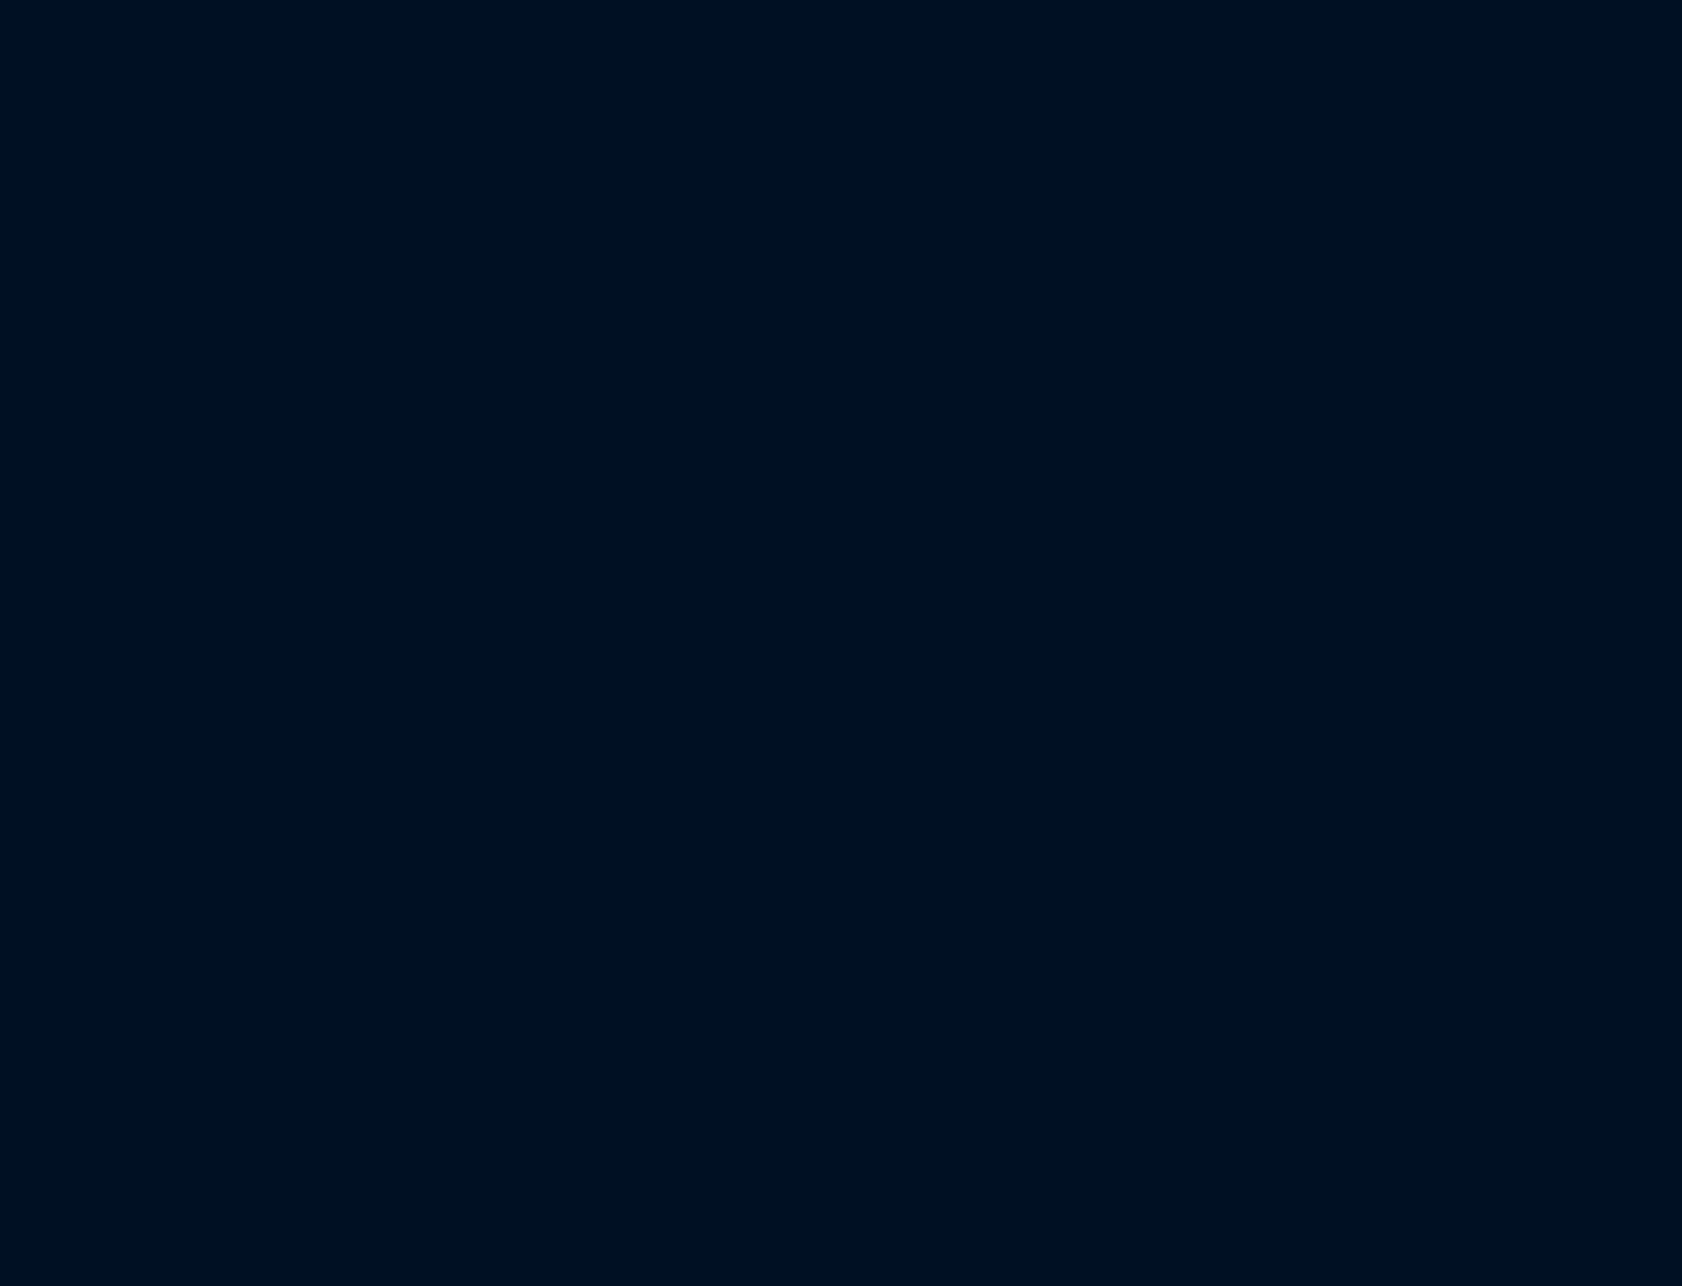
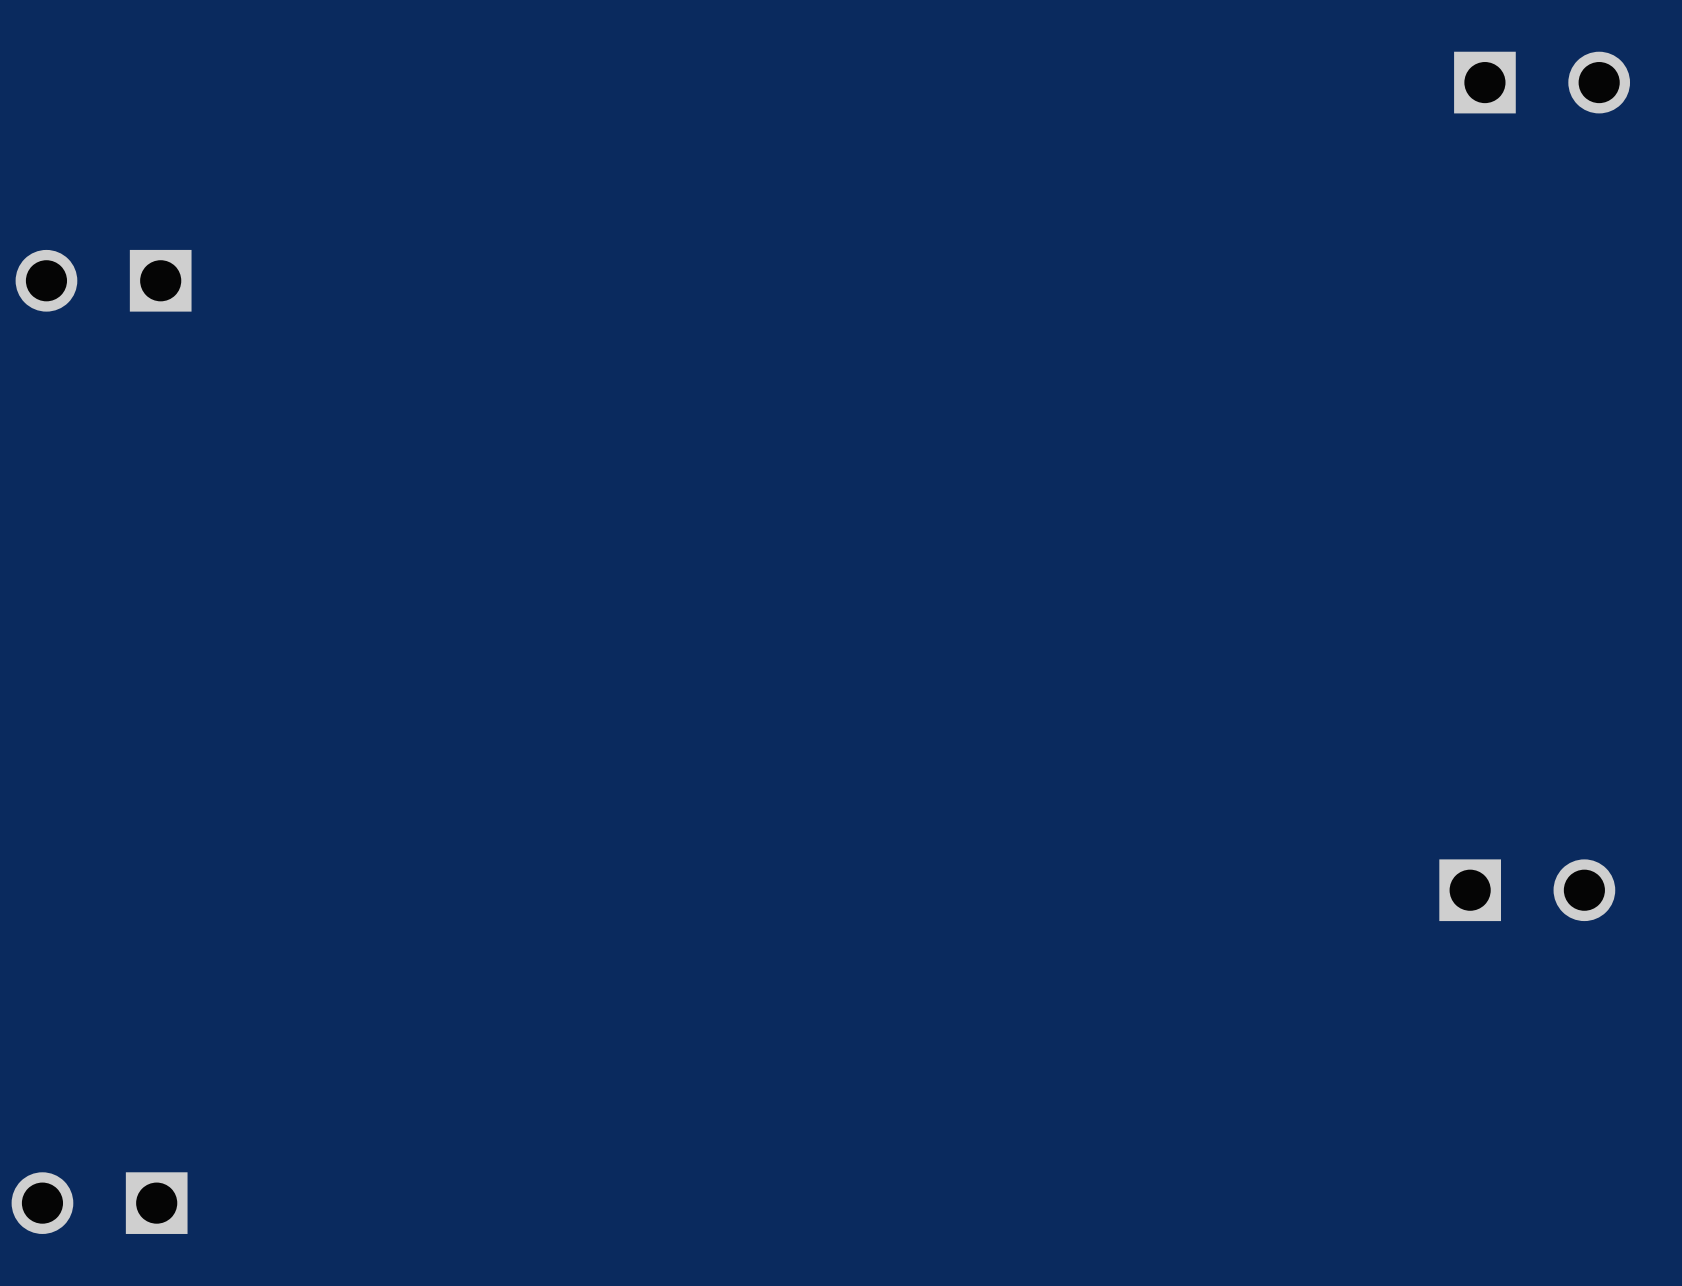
part: none -> (1542, 82)
part: none -> (103, 280)
part: none -> (1527, 890)
part: none -> (99, 1203)

